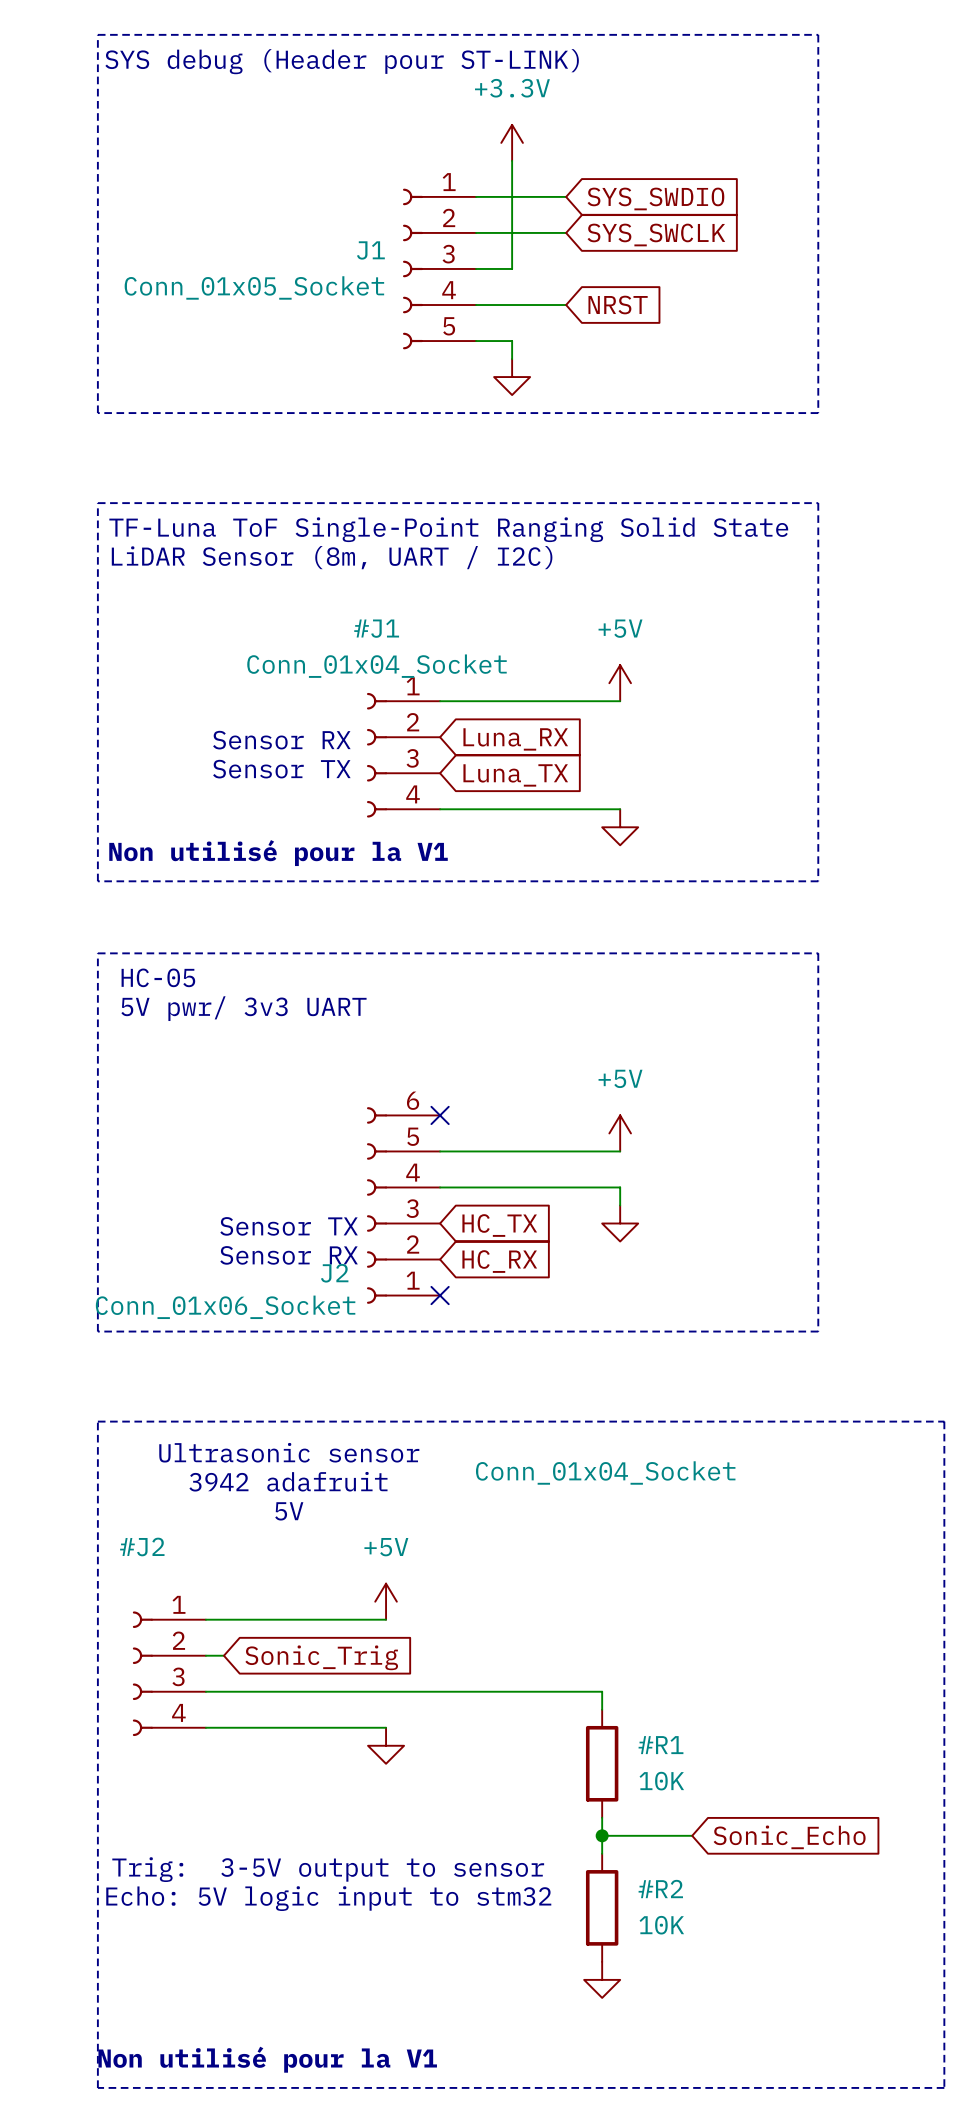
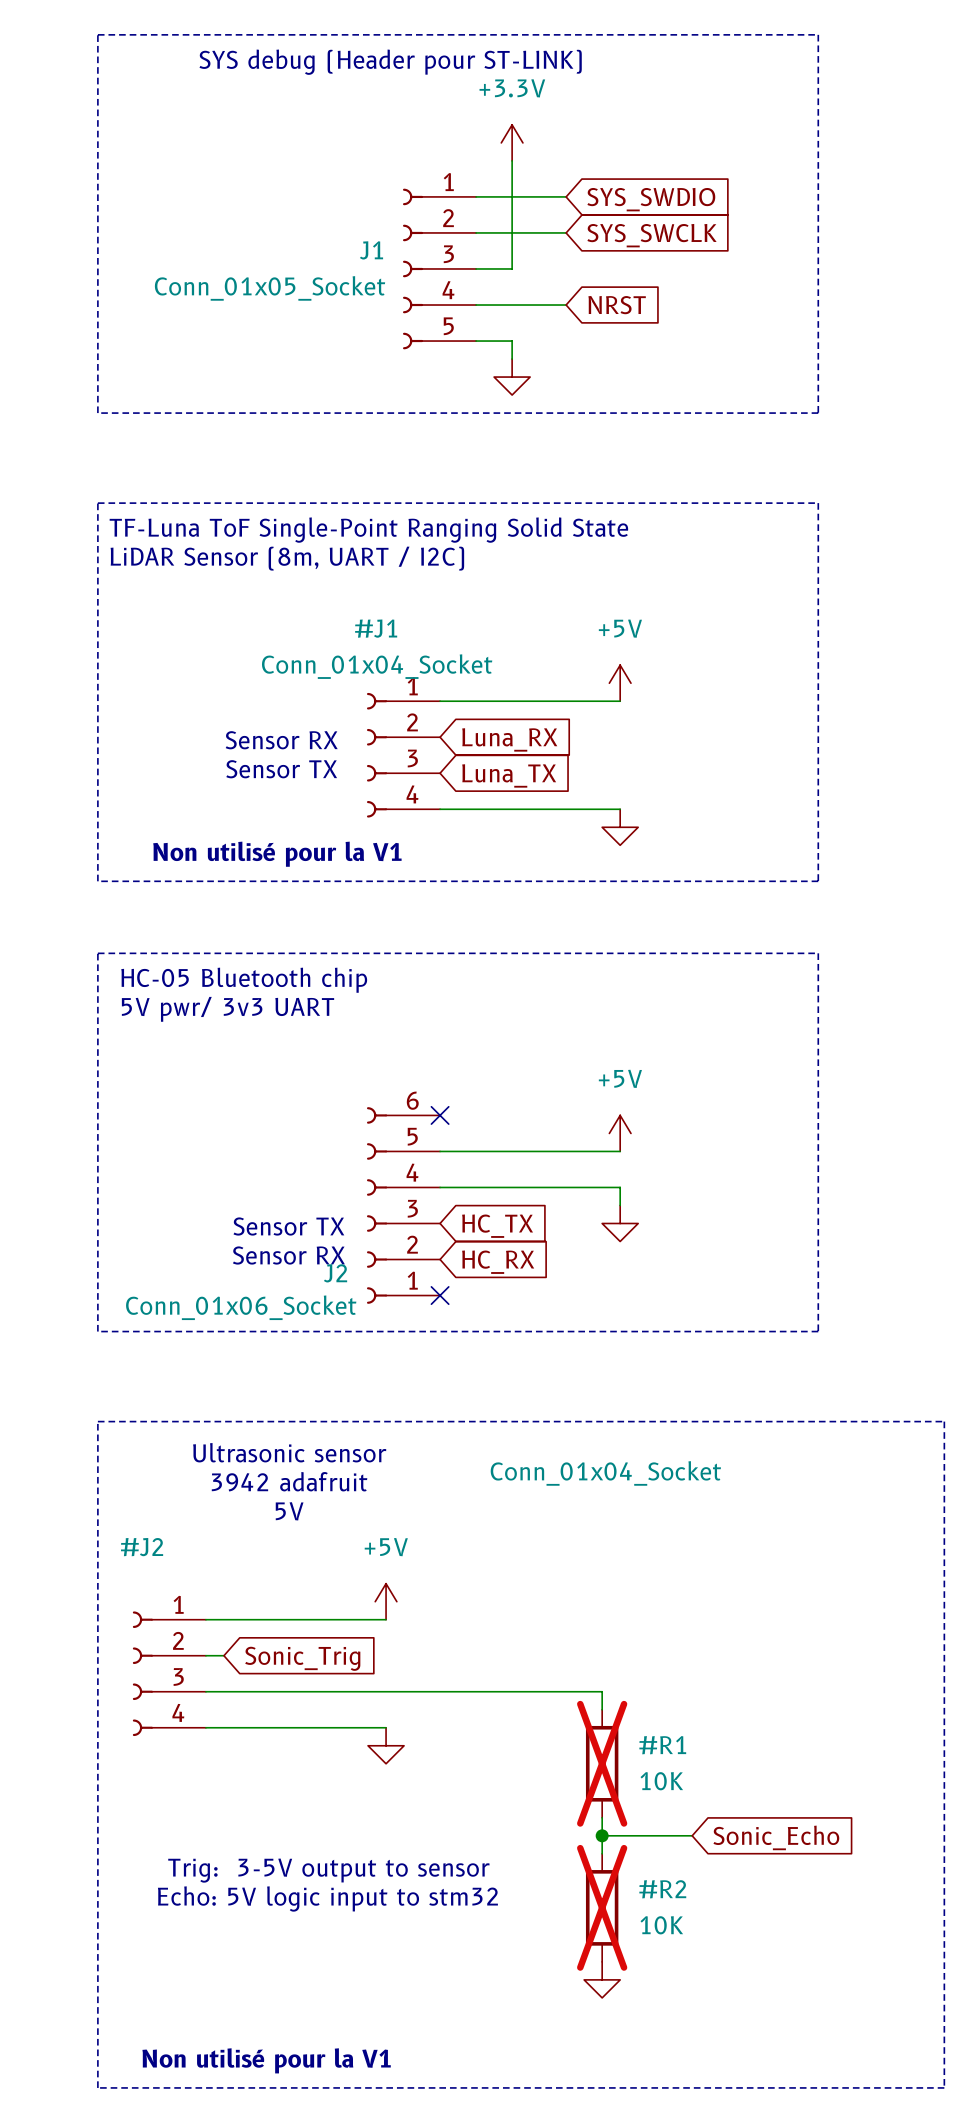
text: HC-05 (158, 977) -> HC-05 Bluetooth chip (244, 980)
#R1 do-not-place cross: none -> (602, 1763)
#R2 do-not-place cross: none -> (602, 1907)

